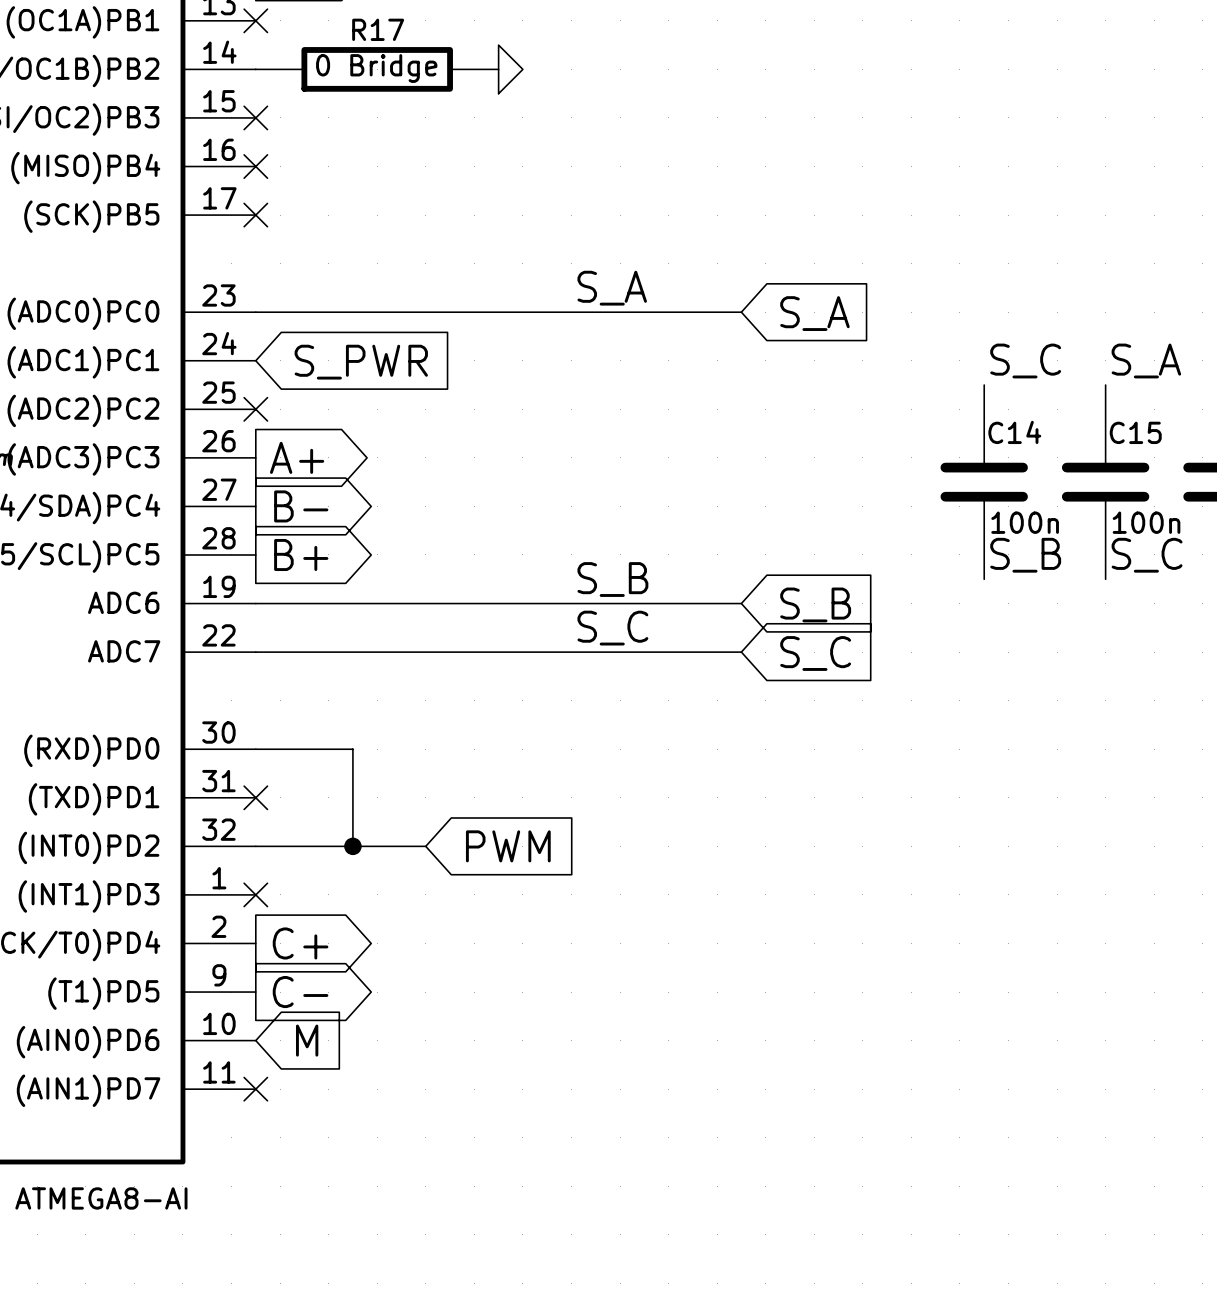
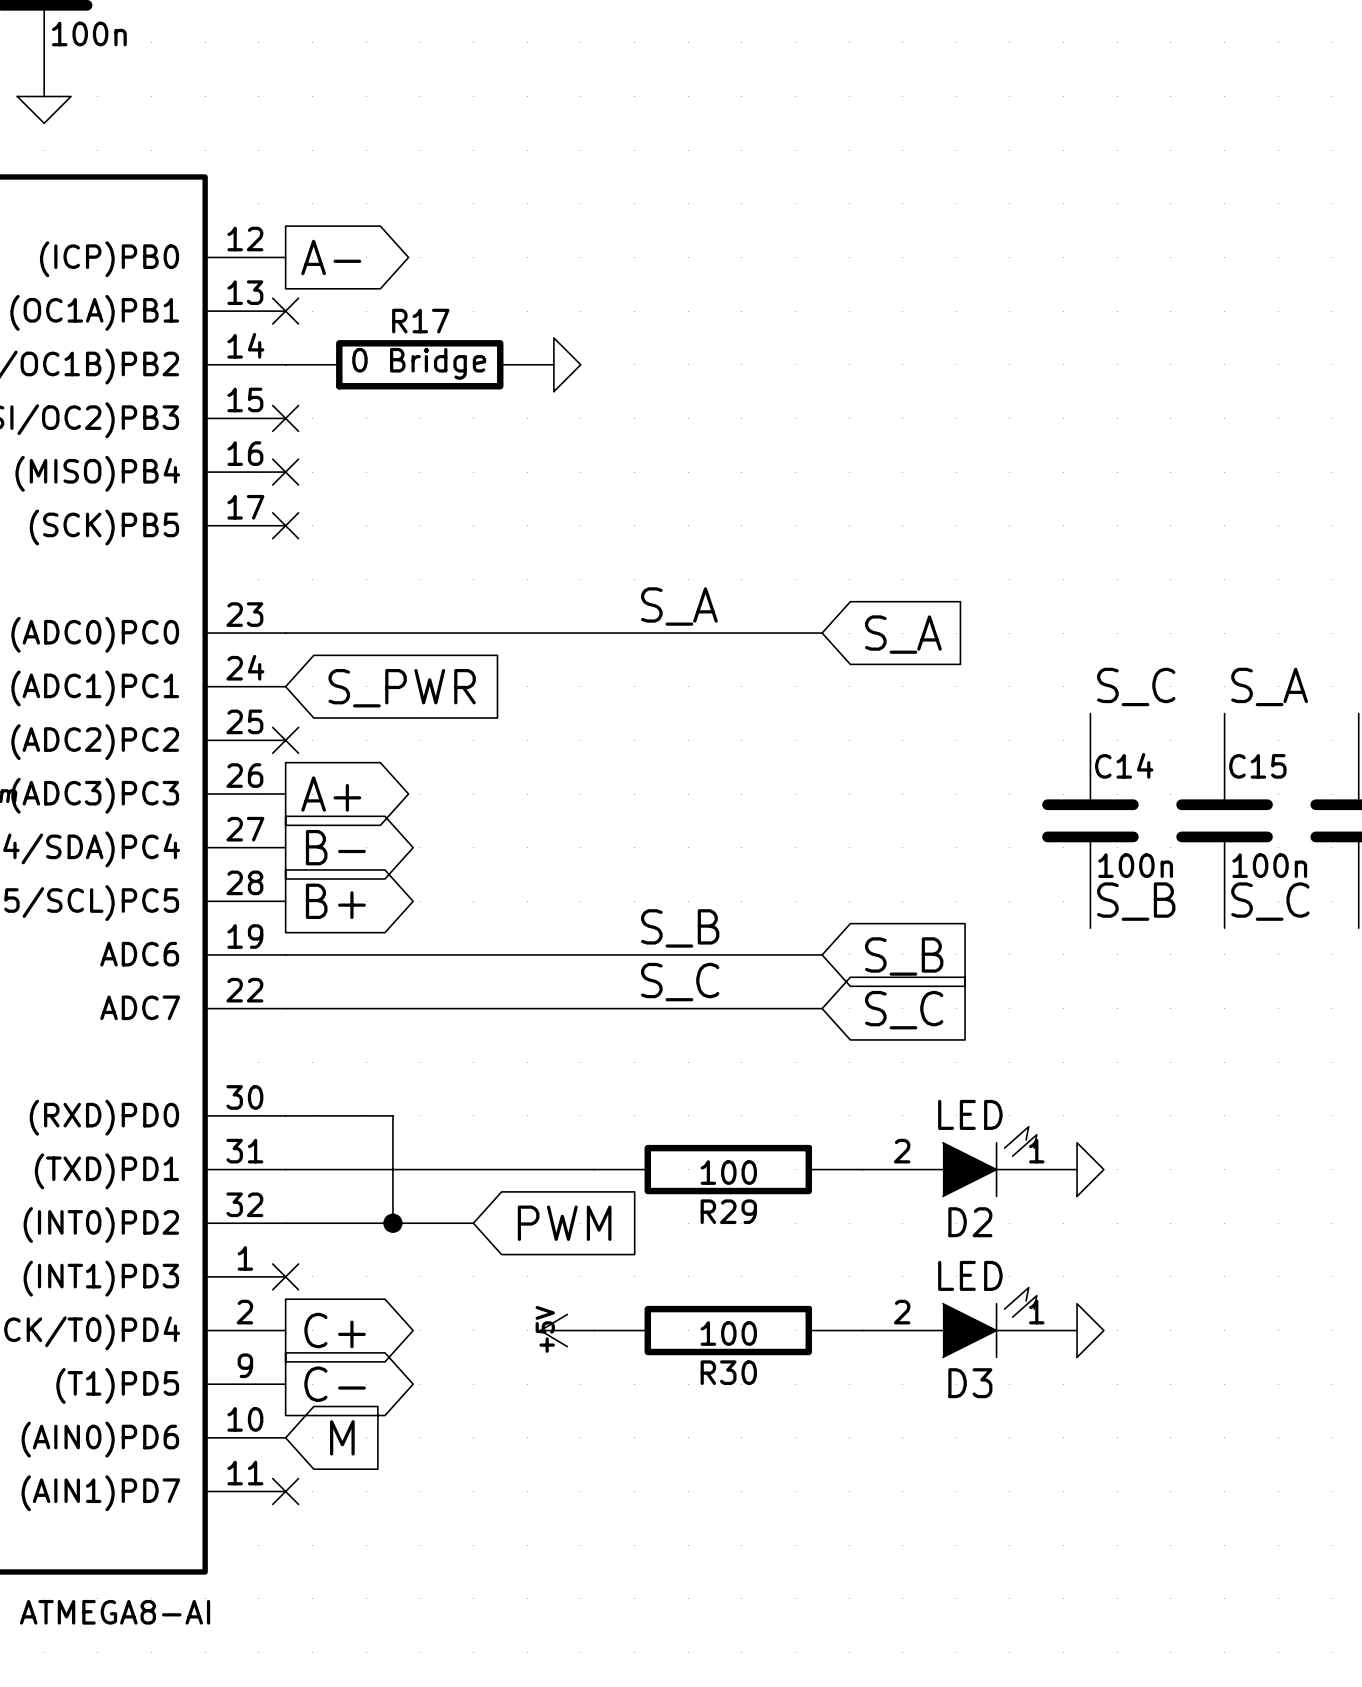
D2: none -> LED (969, 1161)
wire: none -> (285, 1169) (594, 1169)
no-connect mark: (255, 797) -> none
R29: none -> 100 (728, 1169)
power symbol: none -> (1090, 1169)
D3: none -> LED (969, 1322)
power symbol: none -> +5V (567, 1330)
R30: none -> 100 (728, 1330)
power symbol: none -> (1090, 1330)

